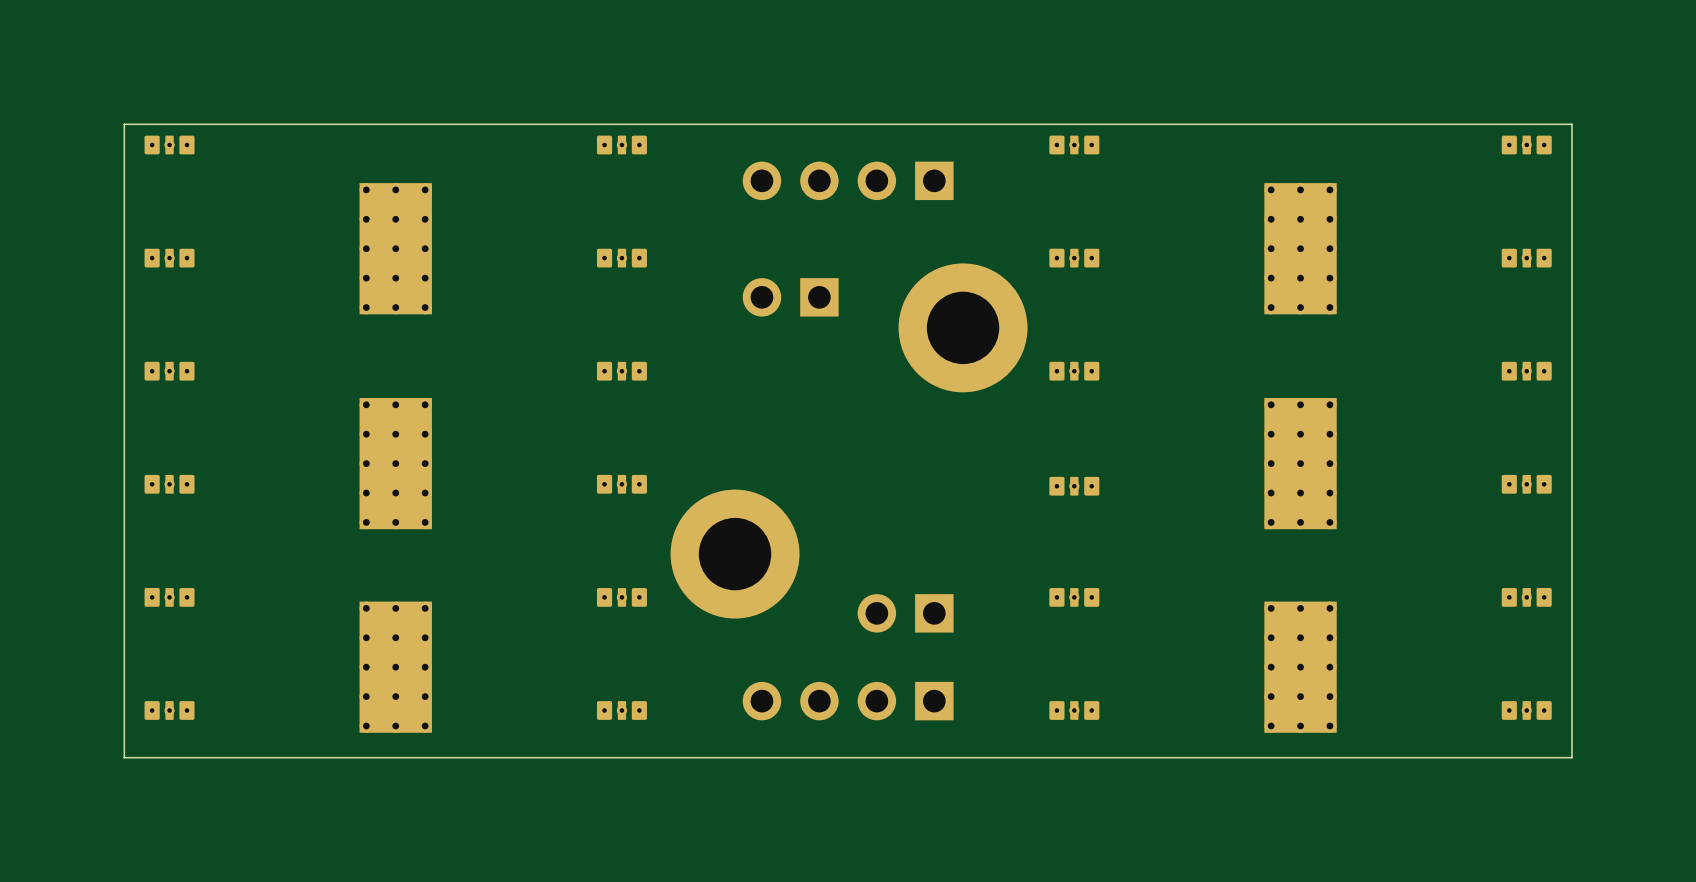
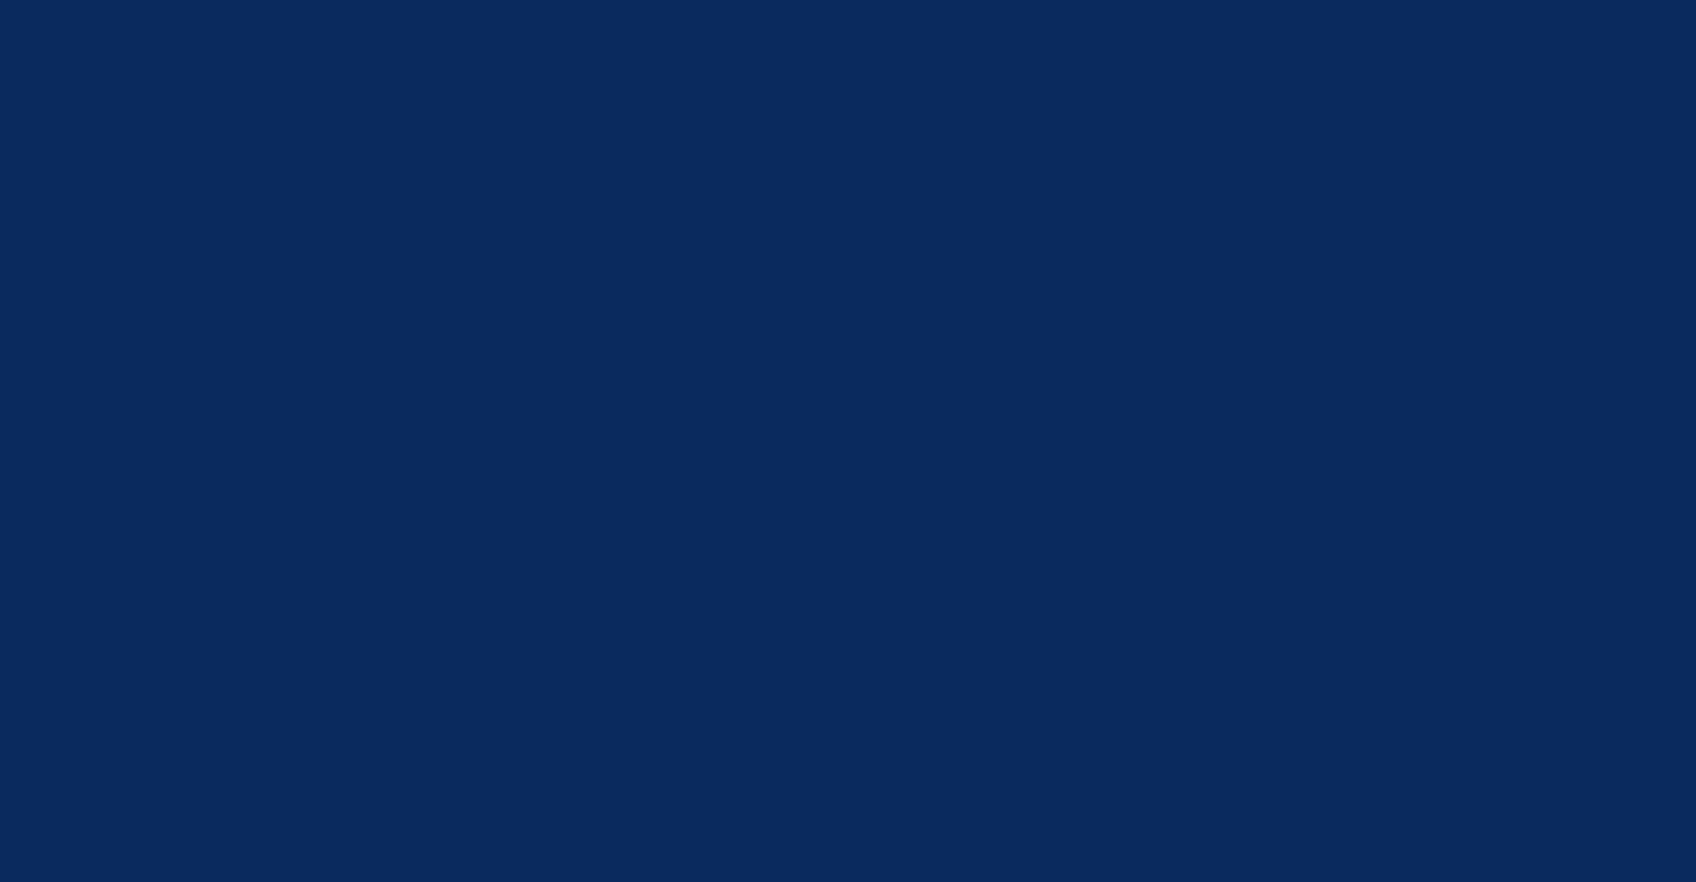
board edge: (1571, 124) (1571, 757) (124, 757) (124, 124) (1571, 124) -> none
part: (169, 145) -> none
part: (621, 145) -> none
part: (1074, 145) -> none
part: (1526, 145) -> none
part: (848, 180) -> none
part: (395, 248) -> none
part: (1300, 248) -> none
part: (169, 258) -> none
part: (621, 258) -> none
part: (1074, 258) -> none
part: (1526, 258) -> none
part: (790, 297) -> none
part: (963, 327) -> none
part: (169, 371) -> none
part: (621, 371) -> none
part: (1074, 371) -> none
part: (1526, 371) -> none
part: (395, 463) -> none
part: (1300, 463) -> none
part: (169, 484) -> none
part: (621, 484) -> none
part: (1526, 484) -> none
part: (1074, 486) -> none
part: (735, 554) -> none
part: (169, 597) -> none
part: (621, 597) -> none
part: (1074, 597) -> none
part: (1526, 597) -> none
part: (905, 613) -> none
part: (395, 667) -> none
part: (1300, 667) -> none
part: (848, 701) -> none
part: (169, 710) -> none
part: (621, 710) -> none
part: (1074, 710) -> none
part: (1526, 710) -> none

